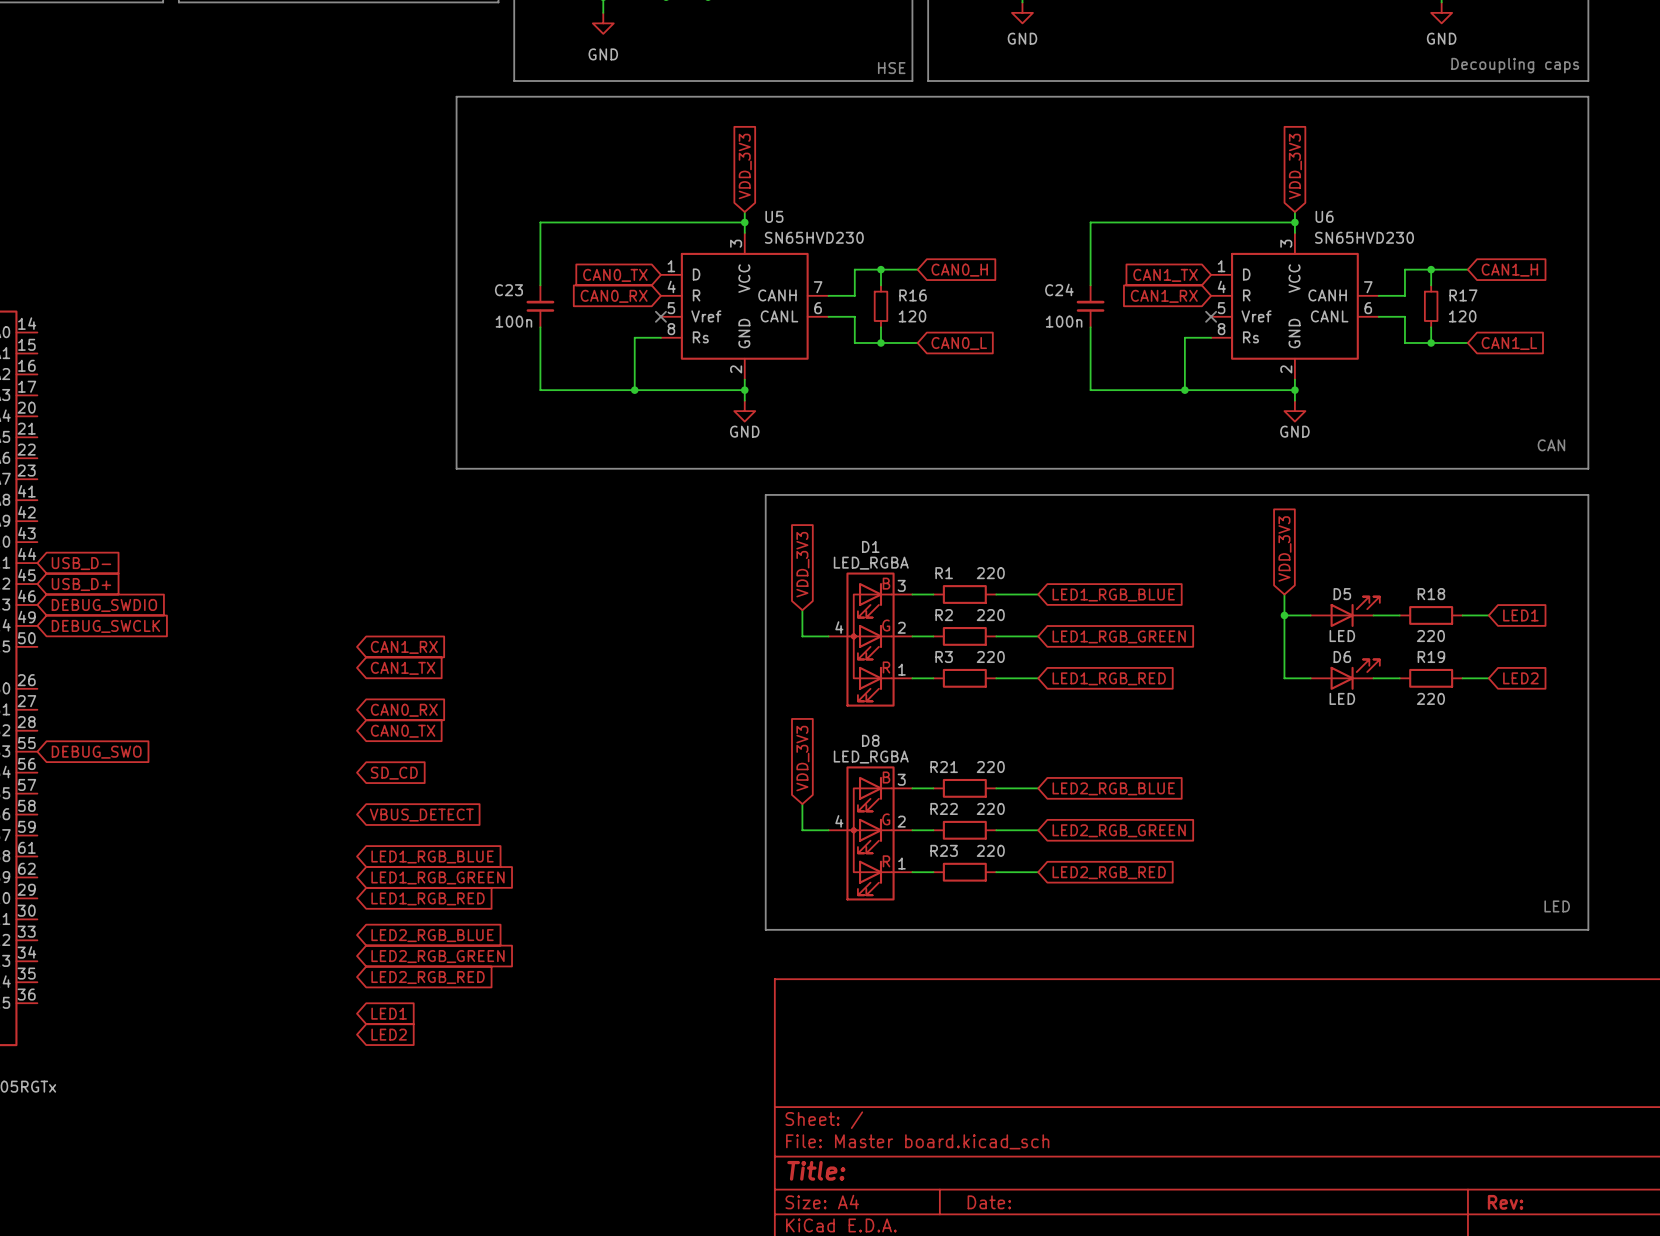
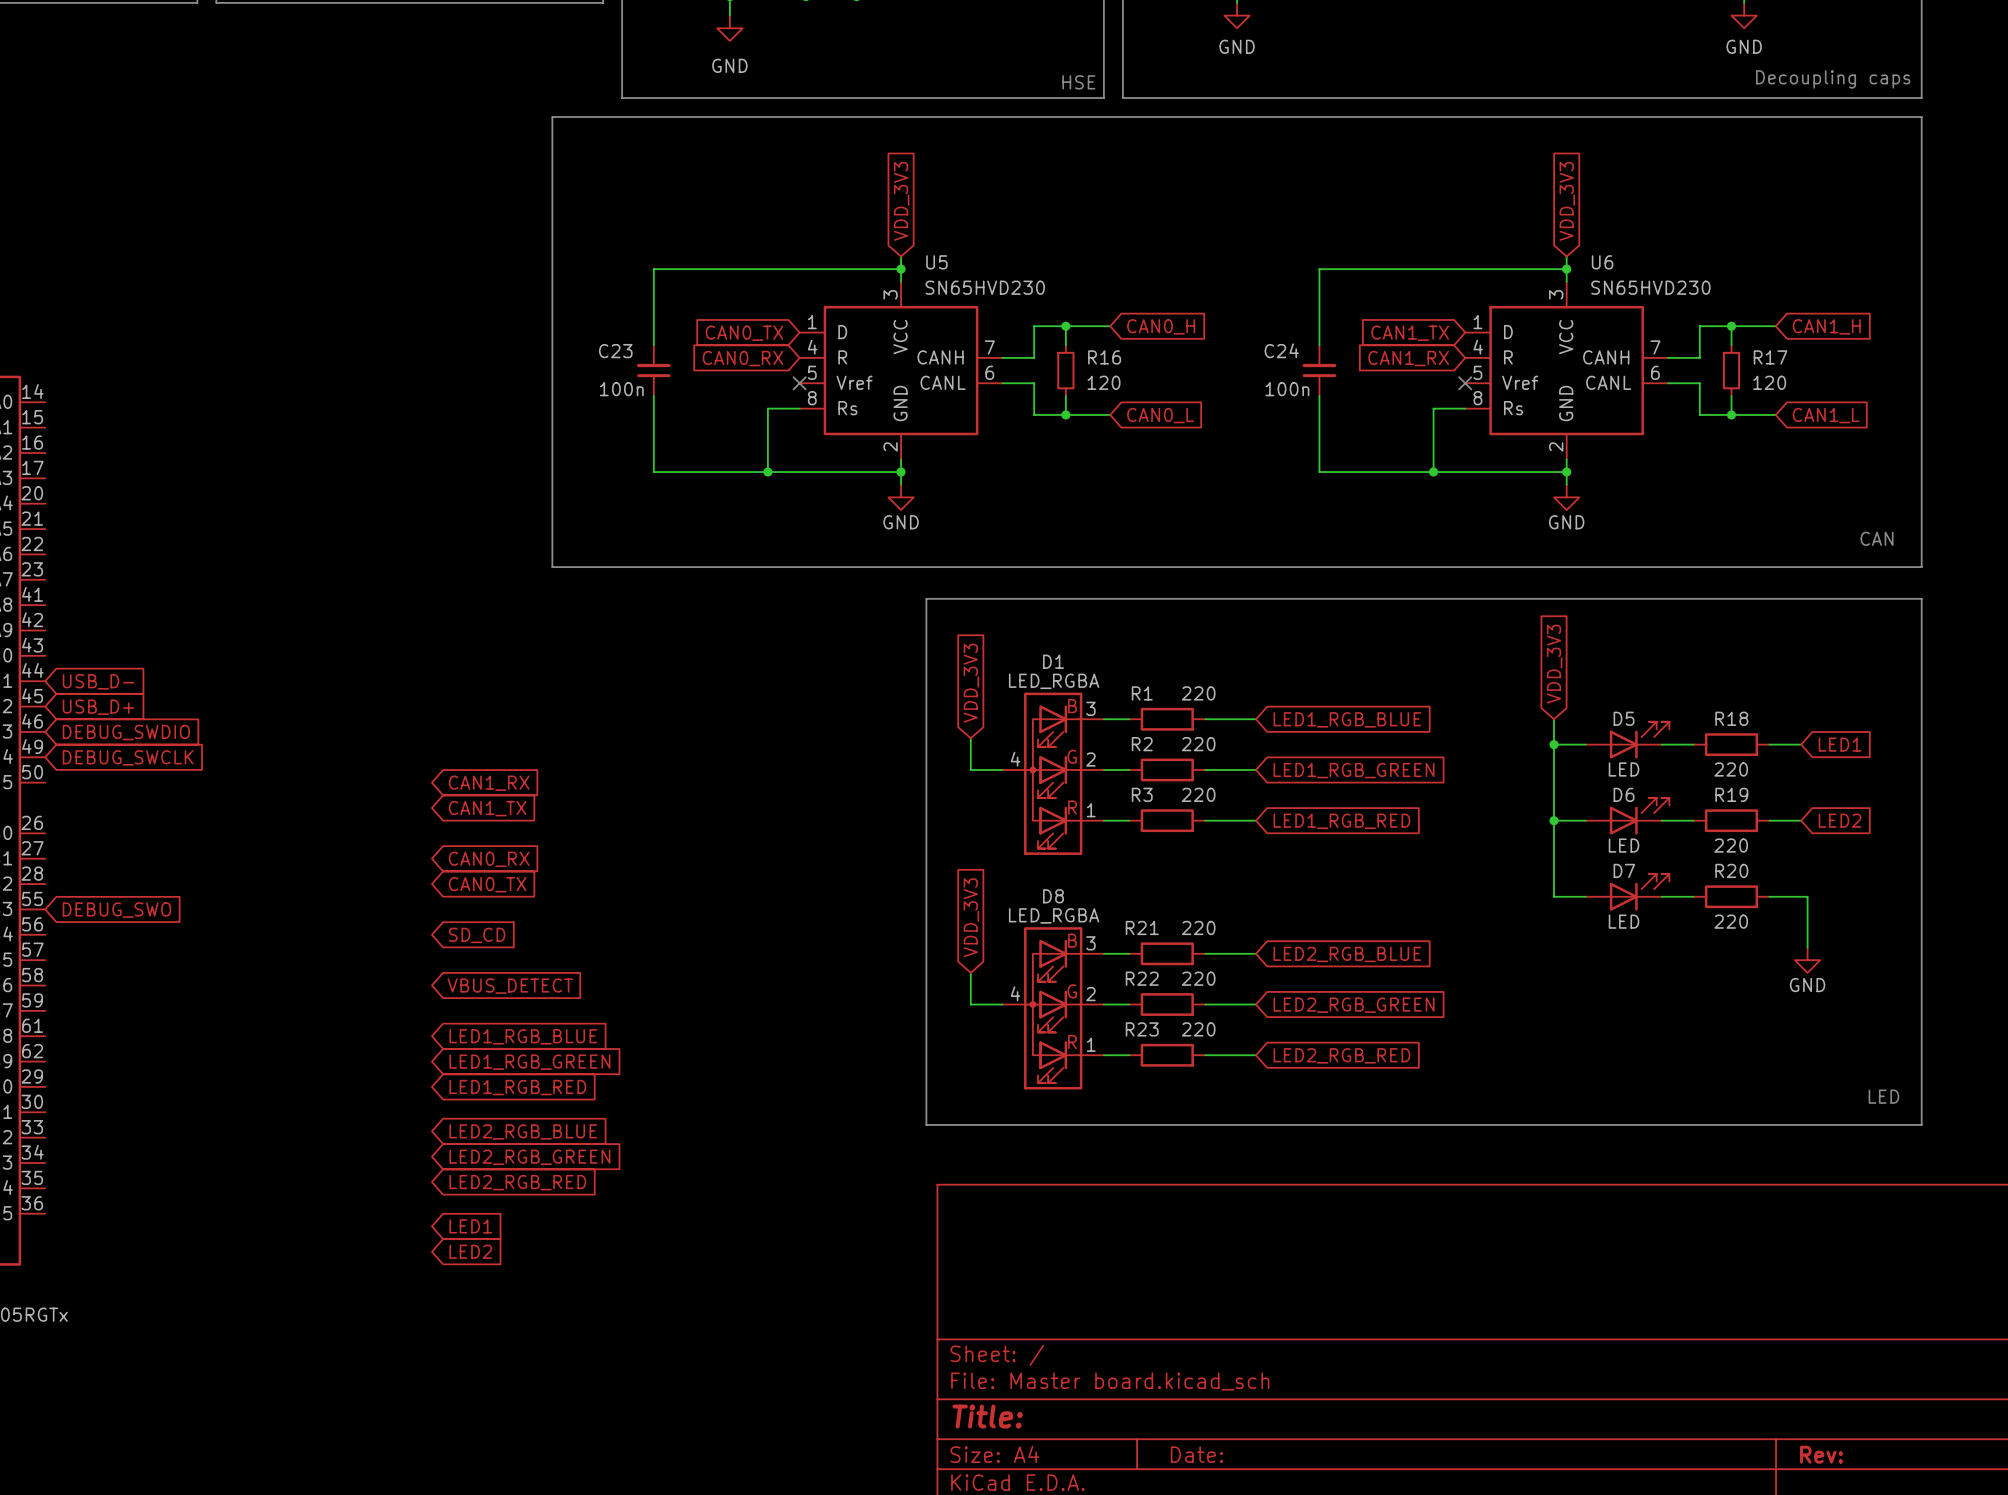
wire: none -> (1554, 820) (1554, 896) (1585, 896)
junction: none -> (1554, 820)
D7: none -> LED (1627, 892)
wire: none -> (1661, 896) (1693, 896)
R20: none -> 220 (1731, 896)
wire: none -> (1769, 896) (1807, 896) (1807, 947)
power symbol: none -> GND (1807, 960)

